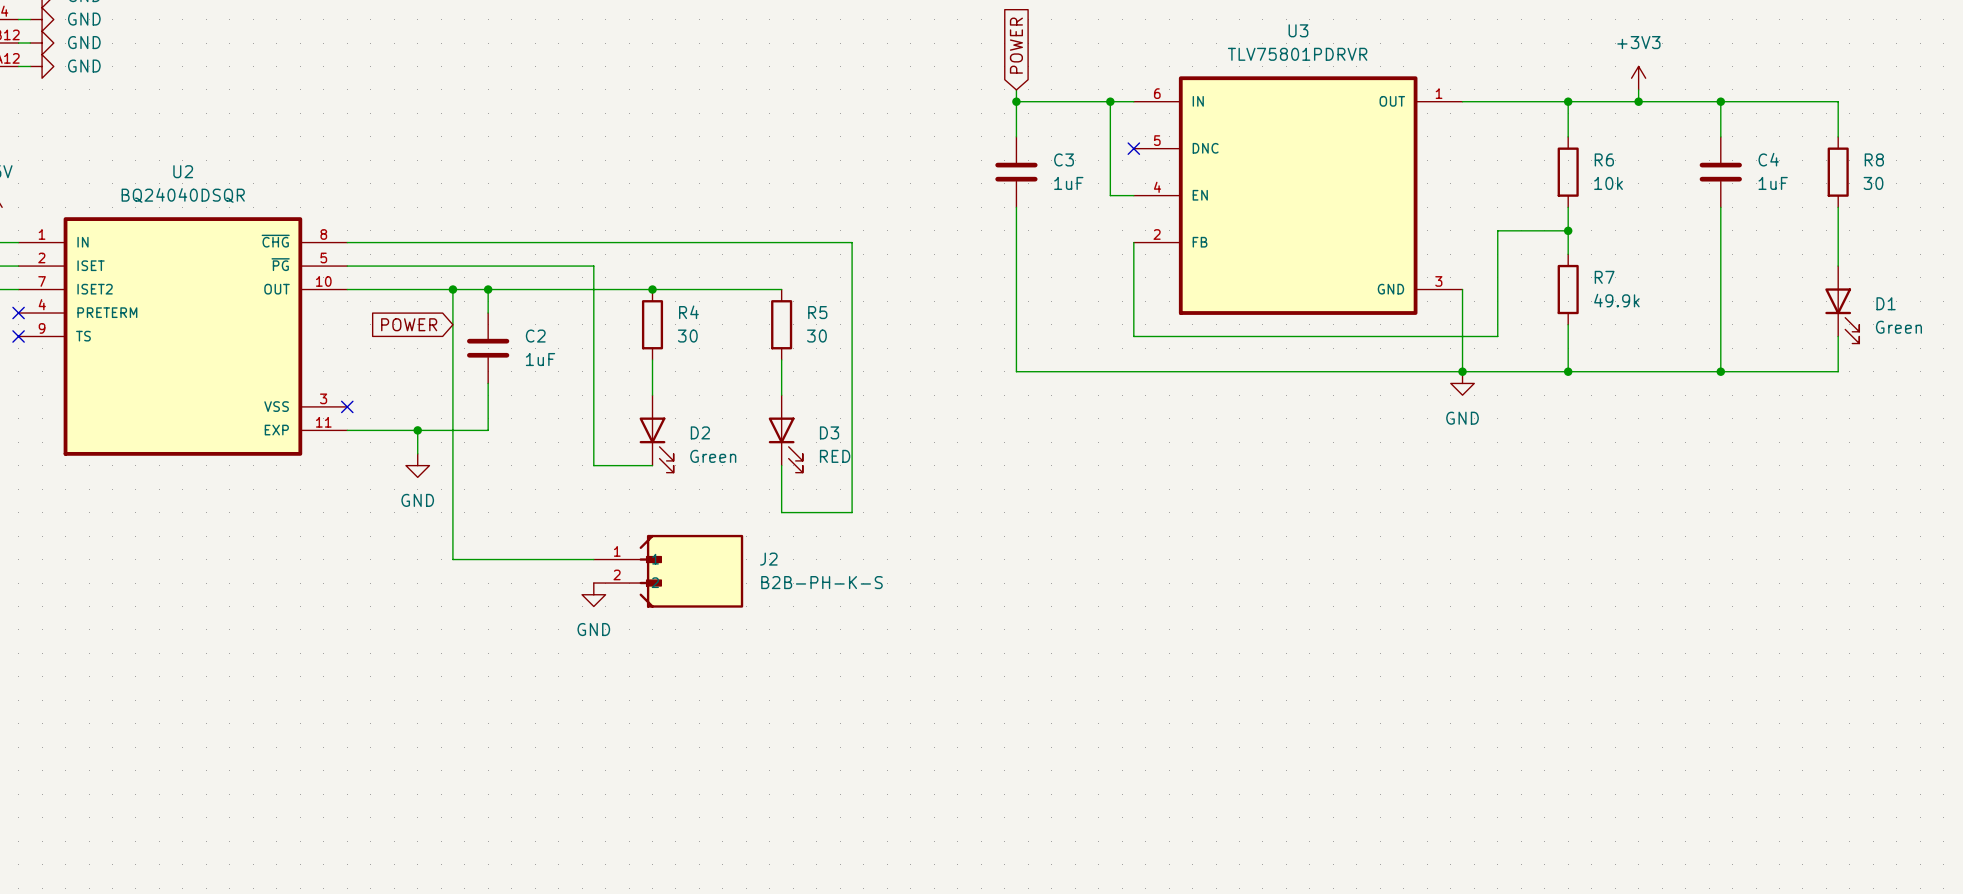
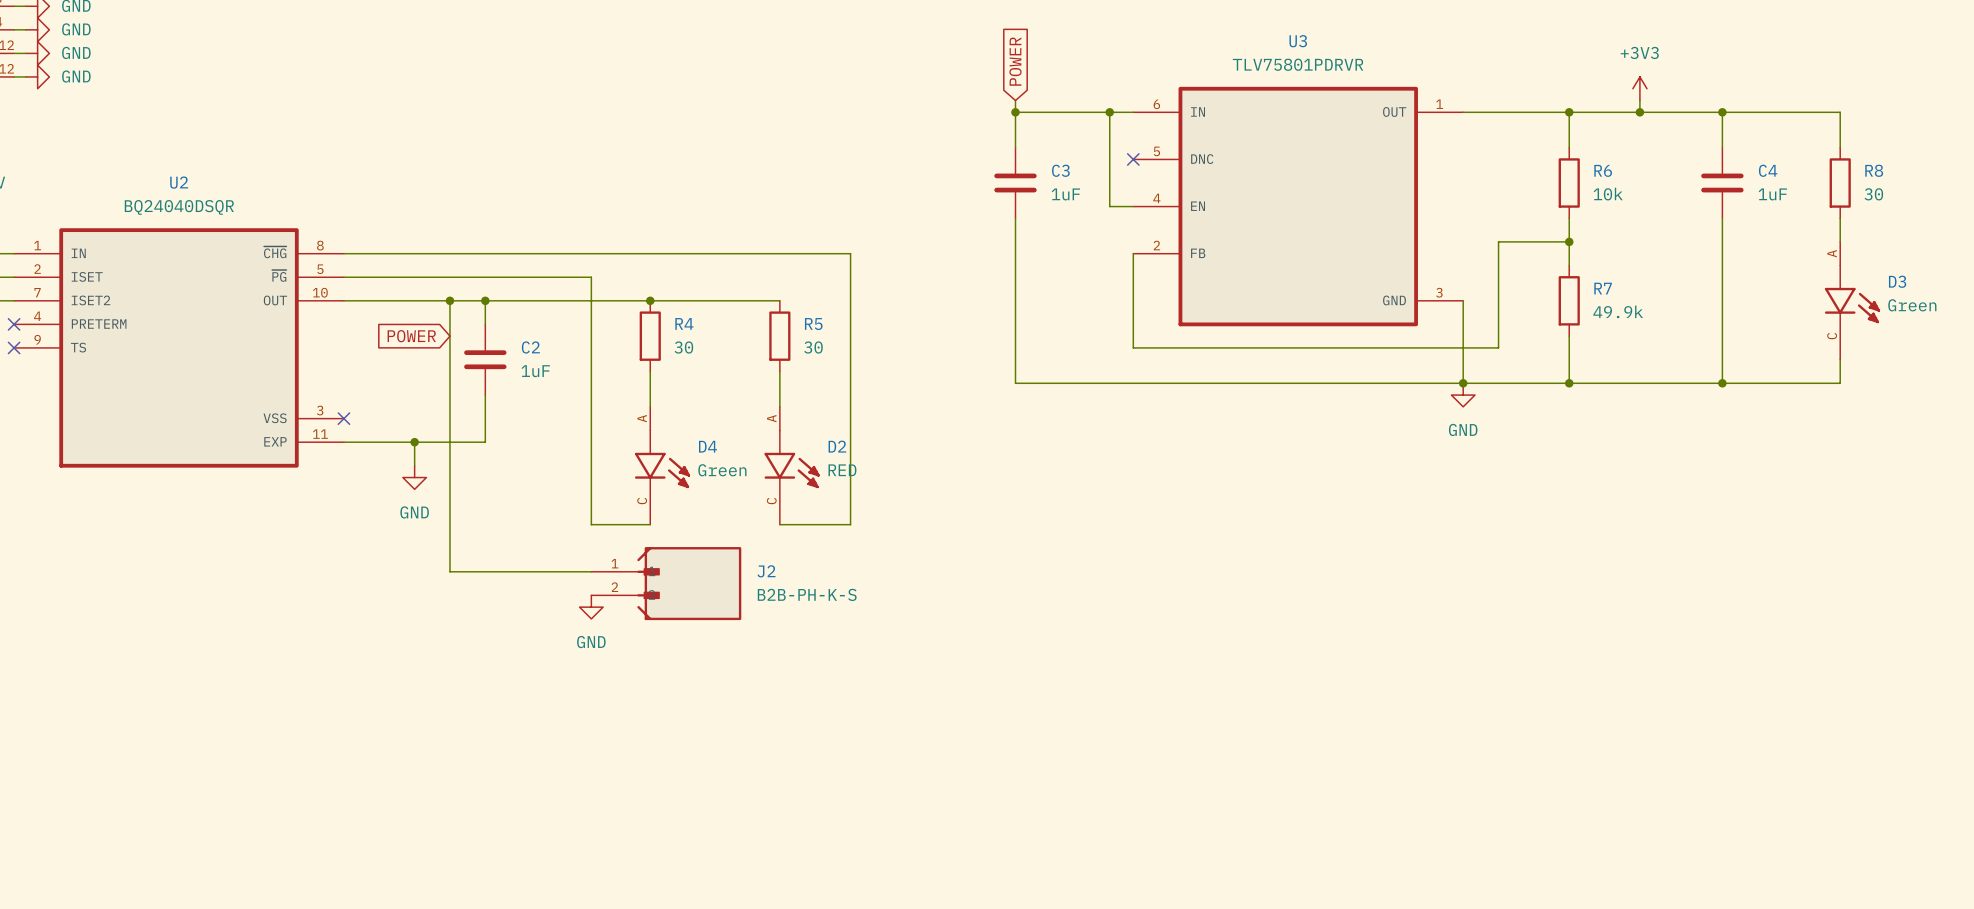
D1: Green (1842, 304) -> none
D2 symbol: [639, 395, 674, 473] -> [764, 406, 820, 525]
D3 symbol: [768, 395, 803, 473] -> [1824, 241, 1881, 360]
D4: none -> Green (662, 465)
D2 value: Green (713, 456) -> RED (842, 470)
D3 value: RED (835, 456) -> Green (1912, 305)
wire: (593, 465) (652, 465) -> (591, 477) (591, 524) (650, 524)

